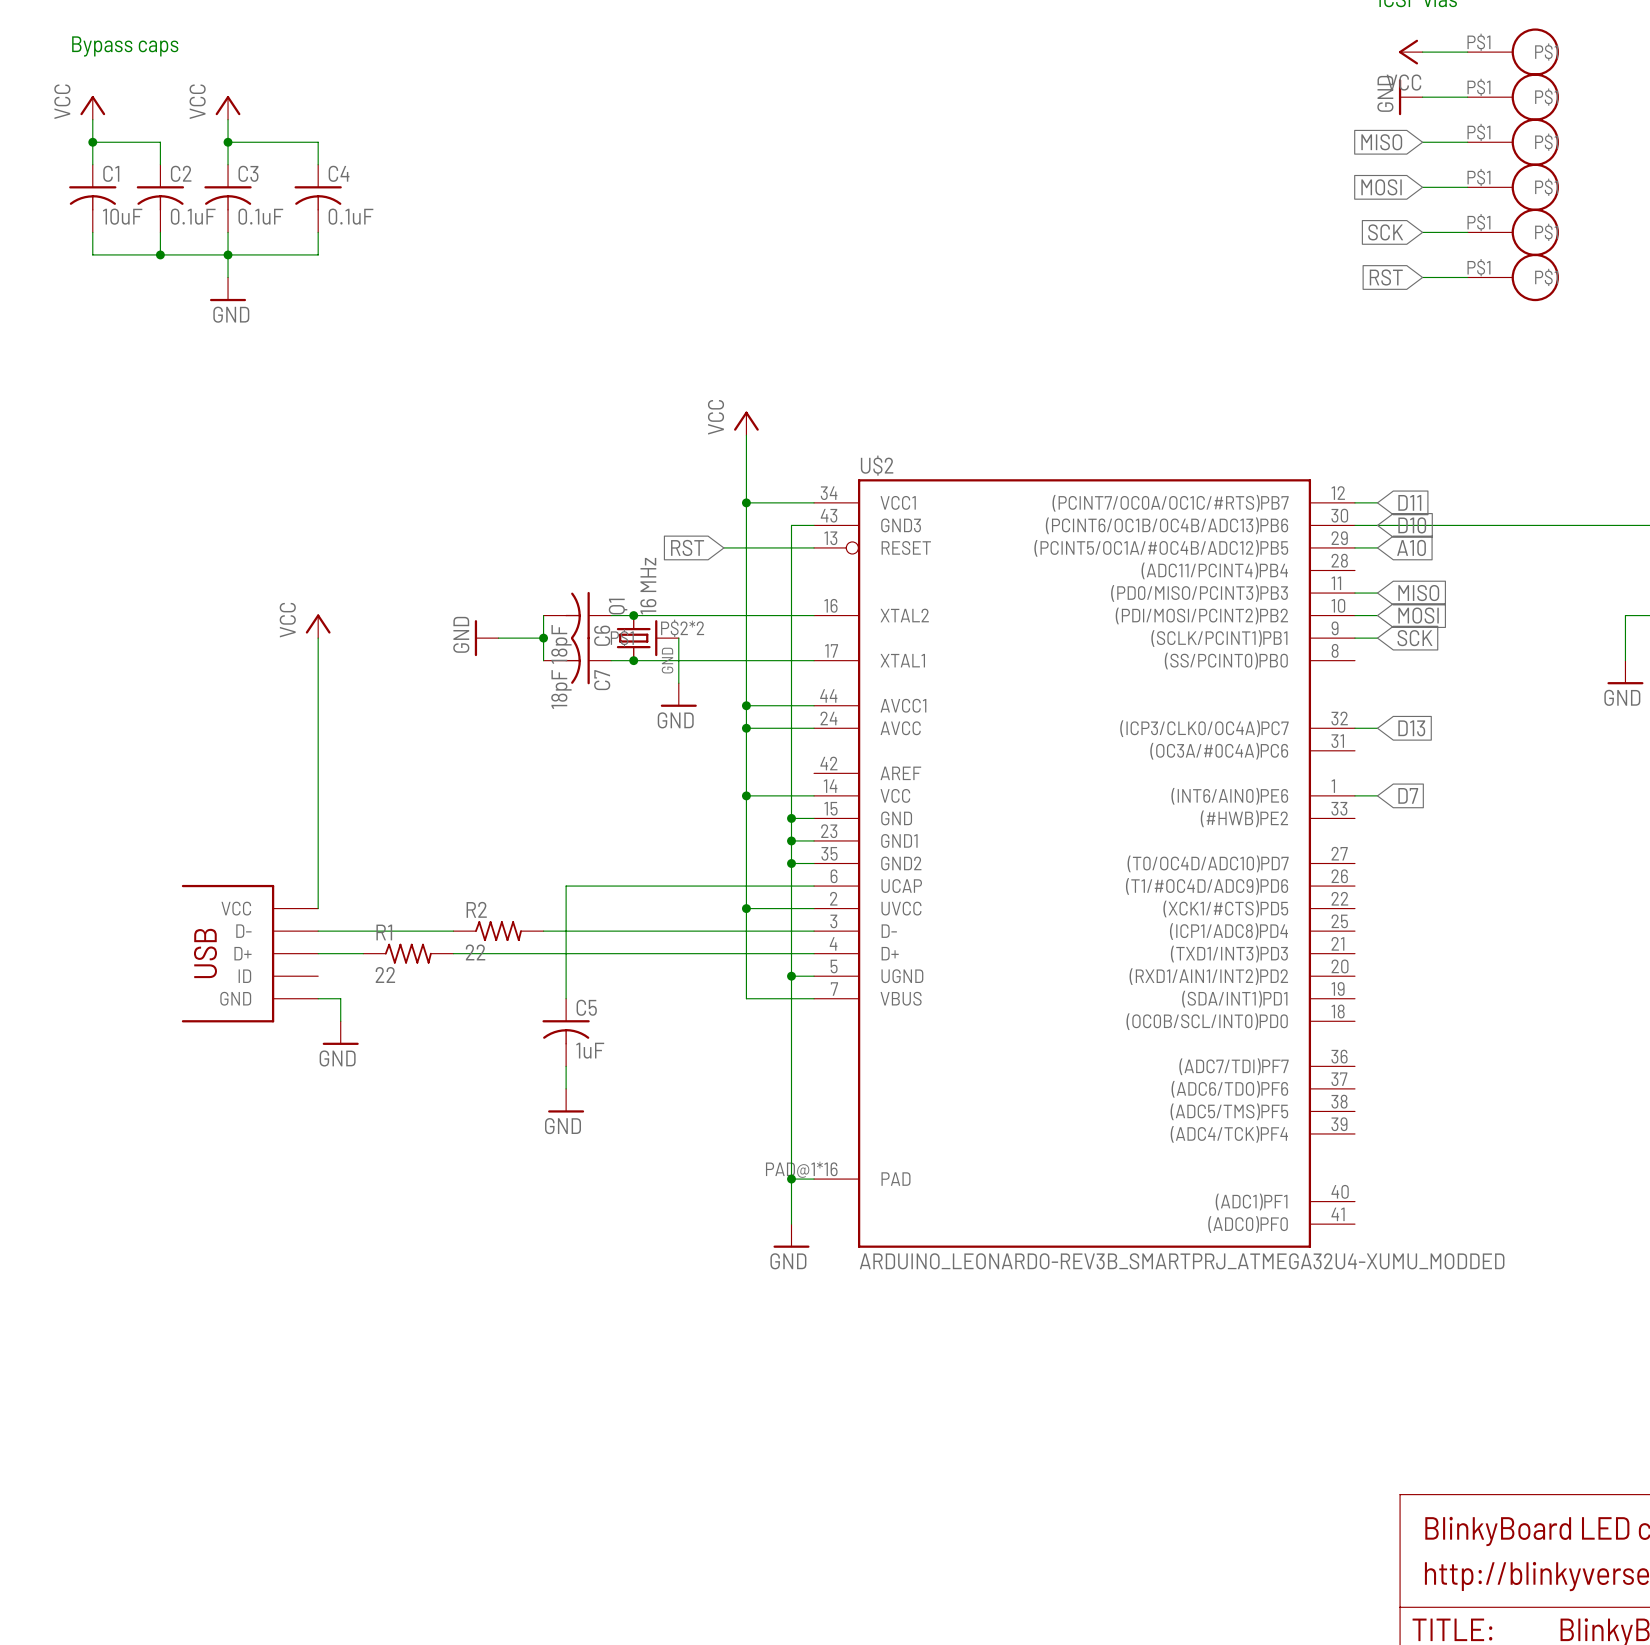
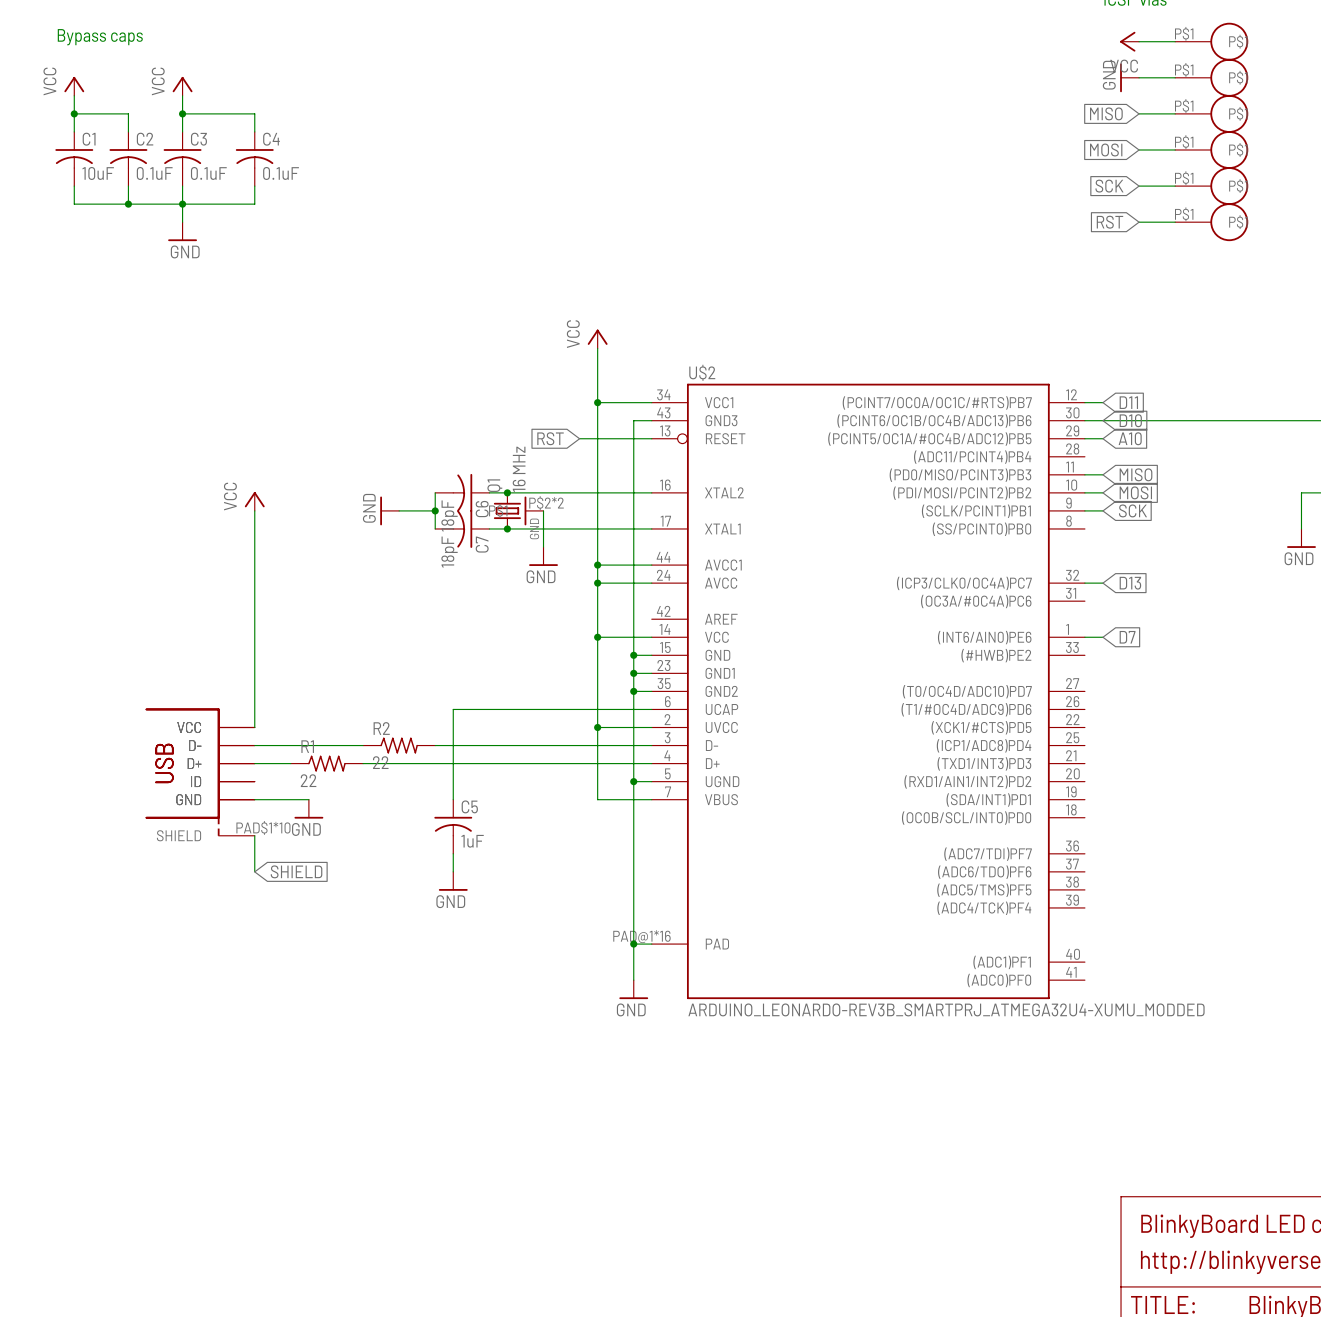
part: none -> (200, 772)
wire: (340, 998) (340, 1021) -> (272, 799) (308, 799)
power symbol position: GND (340, 1033) -> GND (308, 809)
wire: none -> (254, 835) (254, 871)
global label: none -> SHIELD (296, 871)

